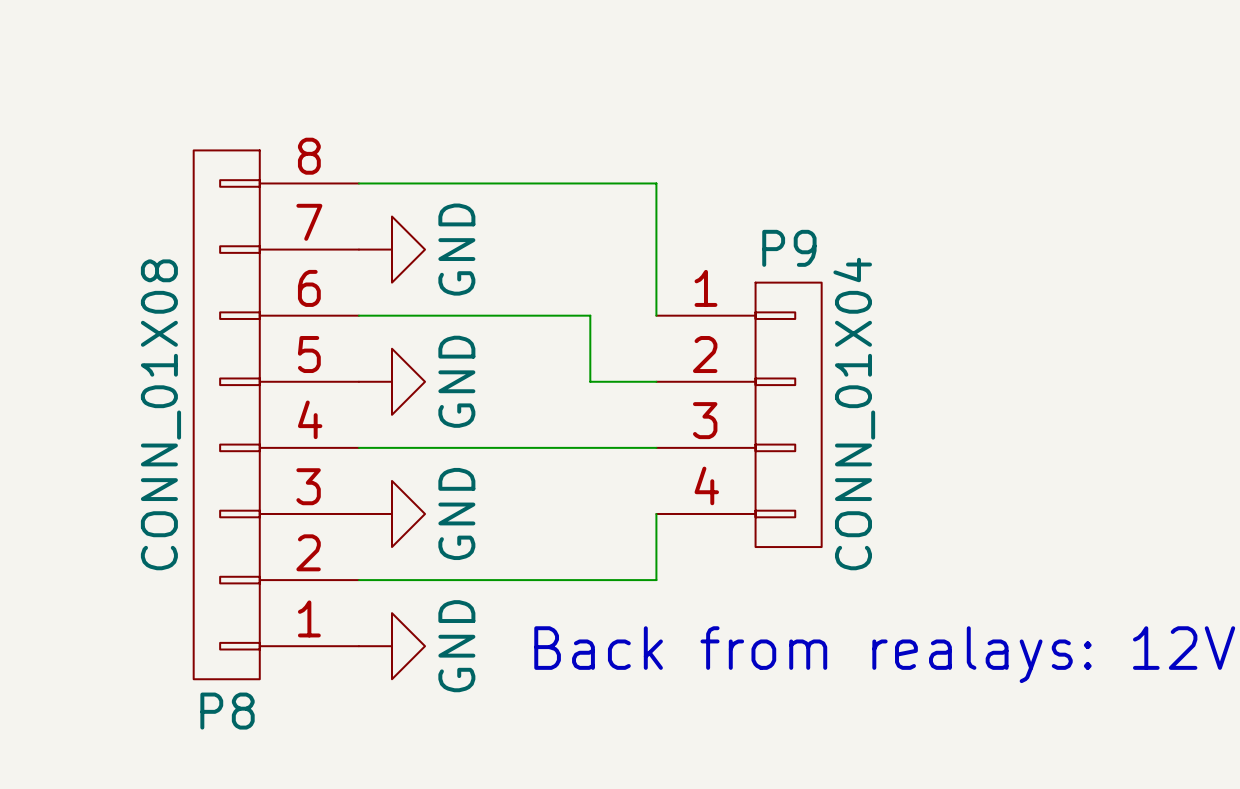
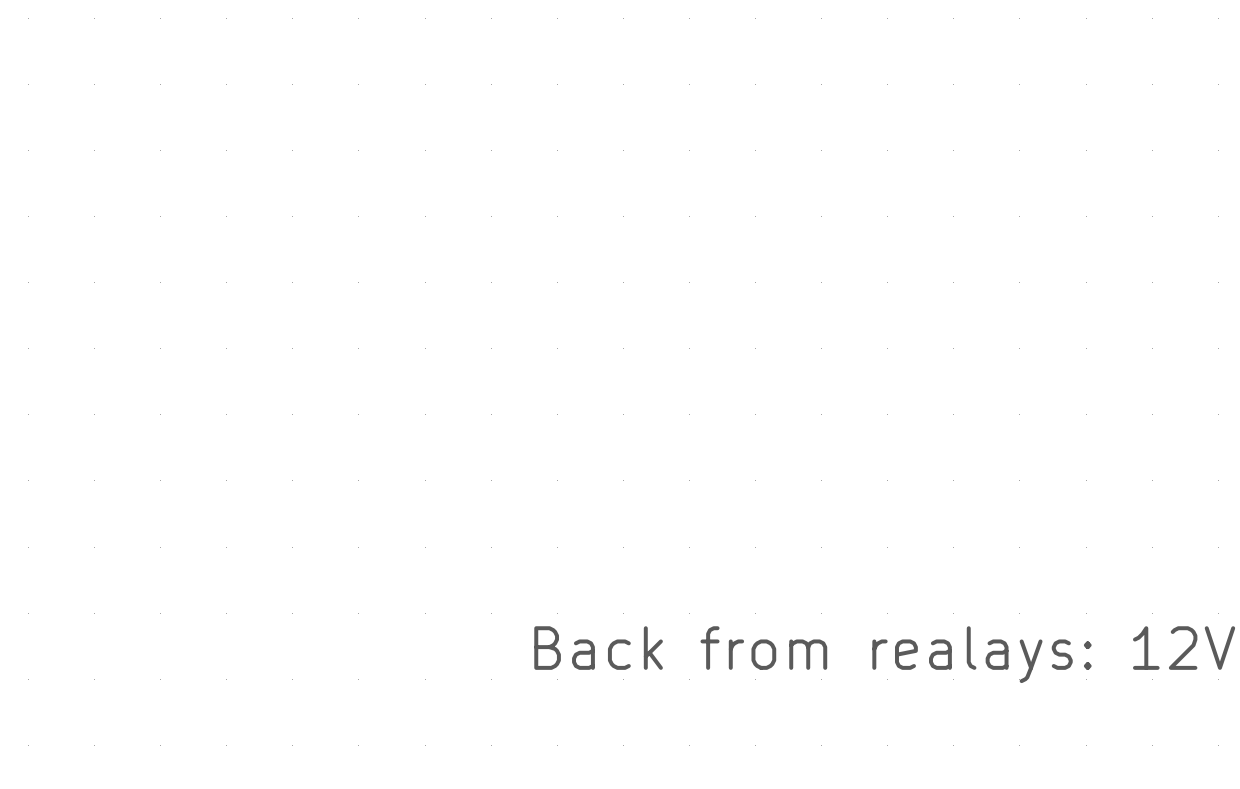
wire: (358, 183) (656, 183) (656, 315) -> none
power symbol: GND (391, 249) -> none
wire: (358, 315) (590, 315) (590, 381) (656, 381) -> none
power symbol: GND (391, 381) -> none
P8: CONN_01X08 (276, 414) -> none
P9: CONN_01X04 (739, 414) -> none
wire: (358, 447) (656, 447) -> none
power symbol: GND (391, 513) -> none
wire: (656, 513) (656, 580) (358, 580) -> none
power symbol: GND (391, 646) -> none

